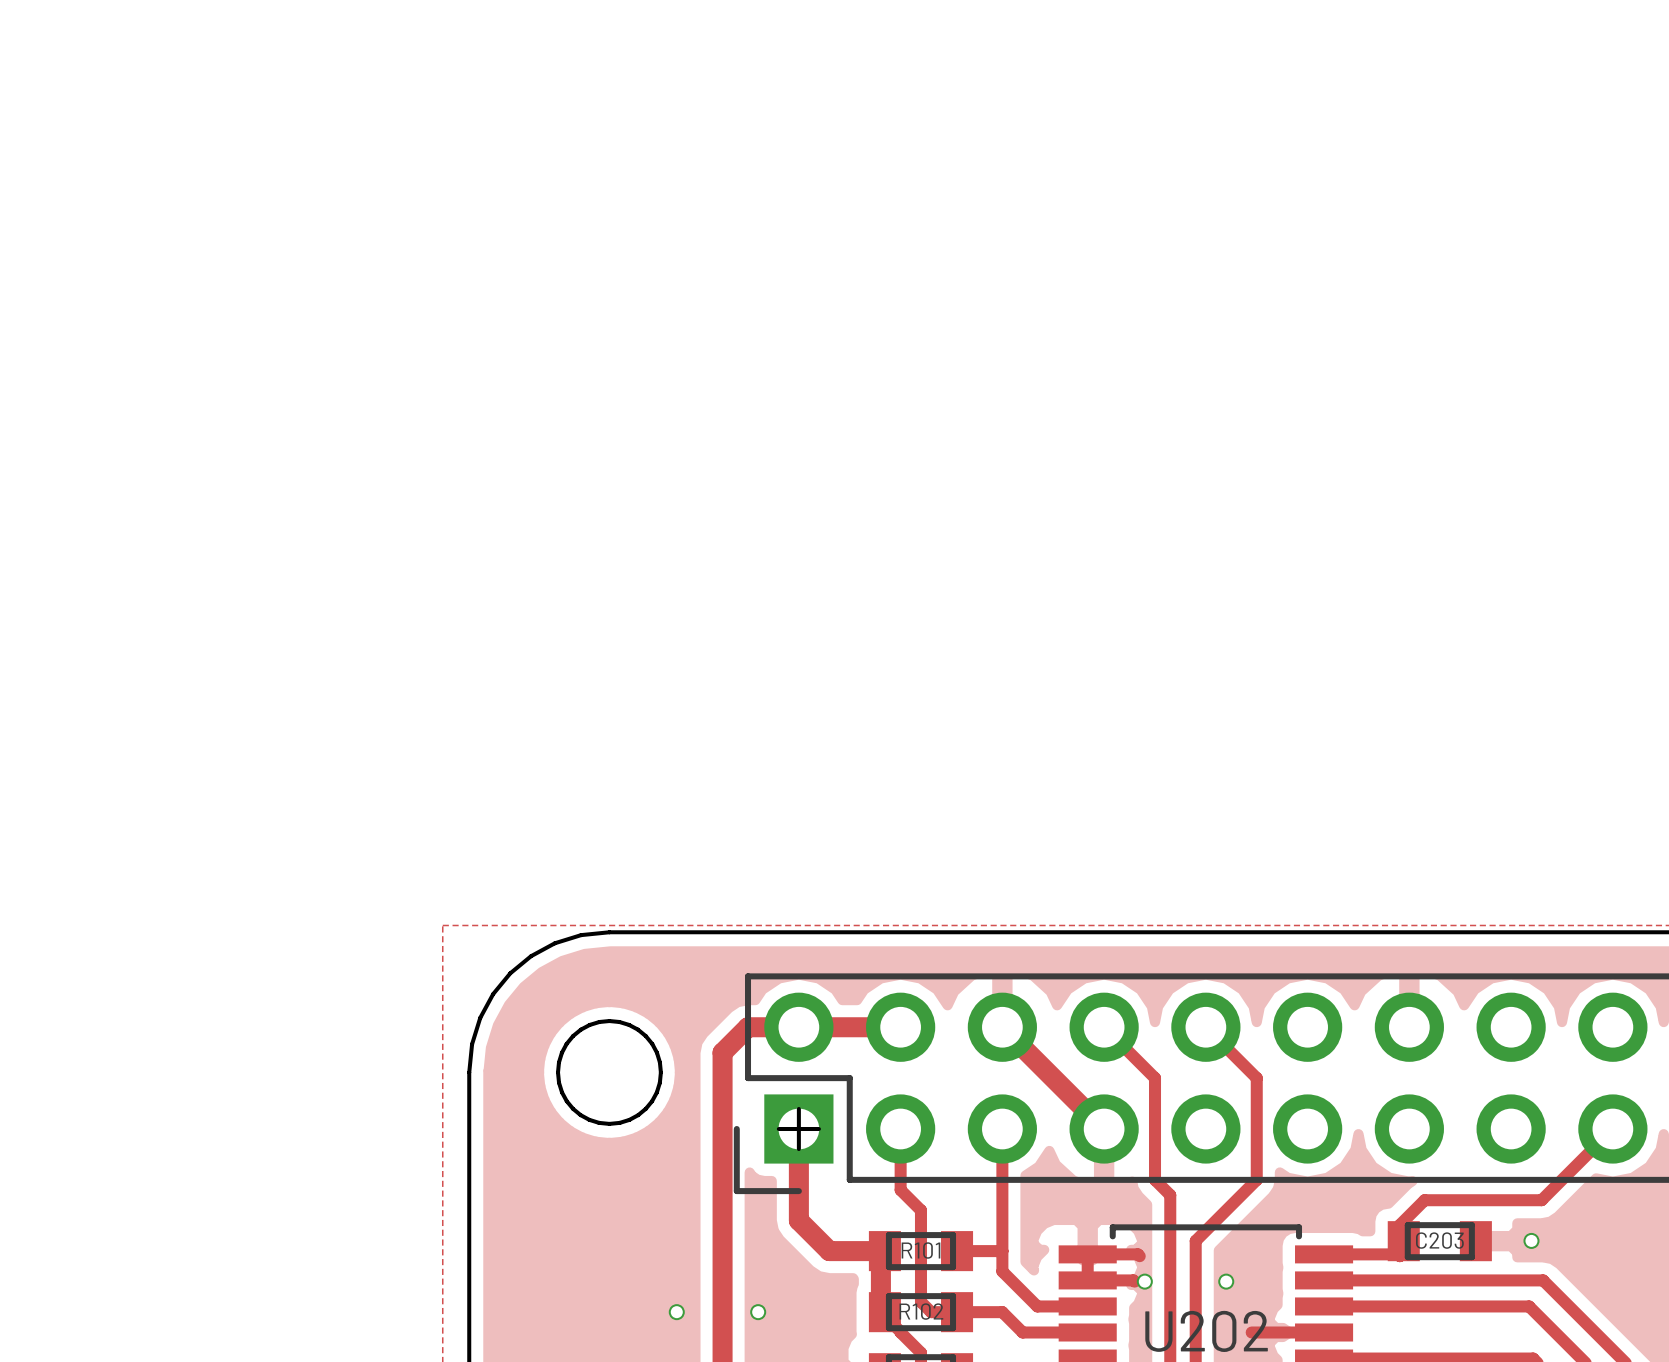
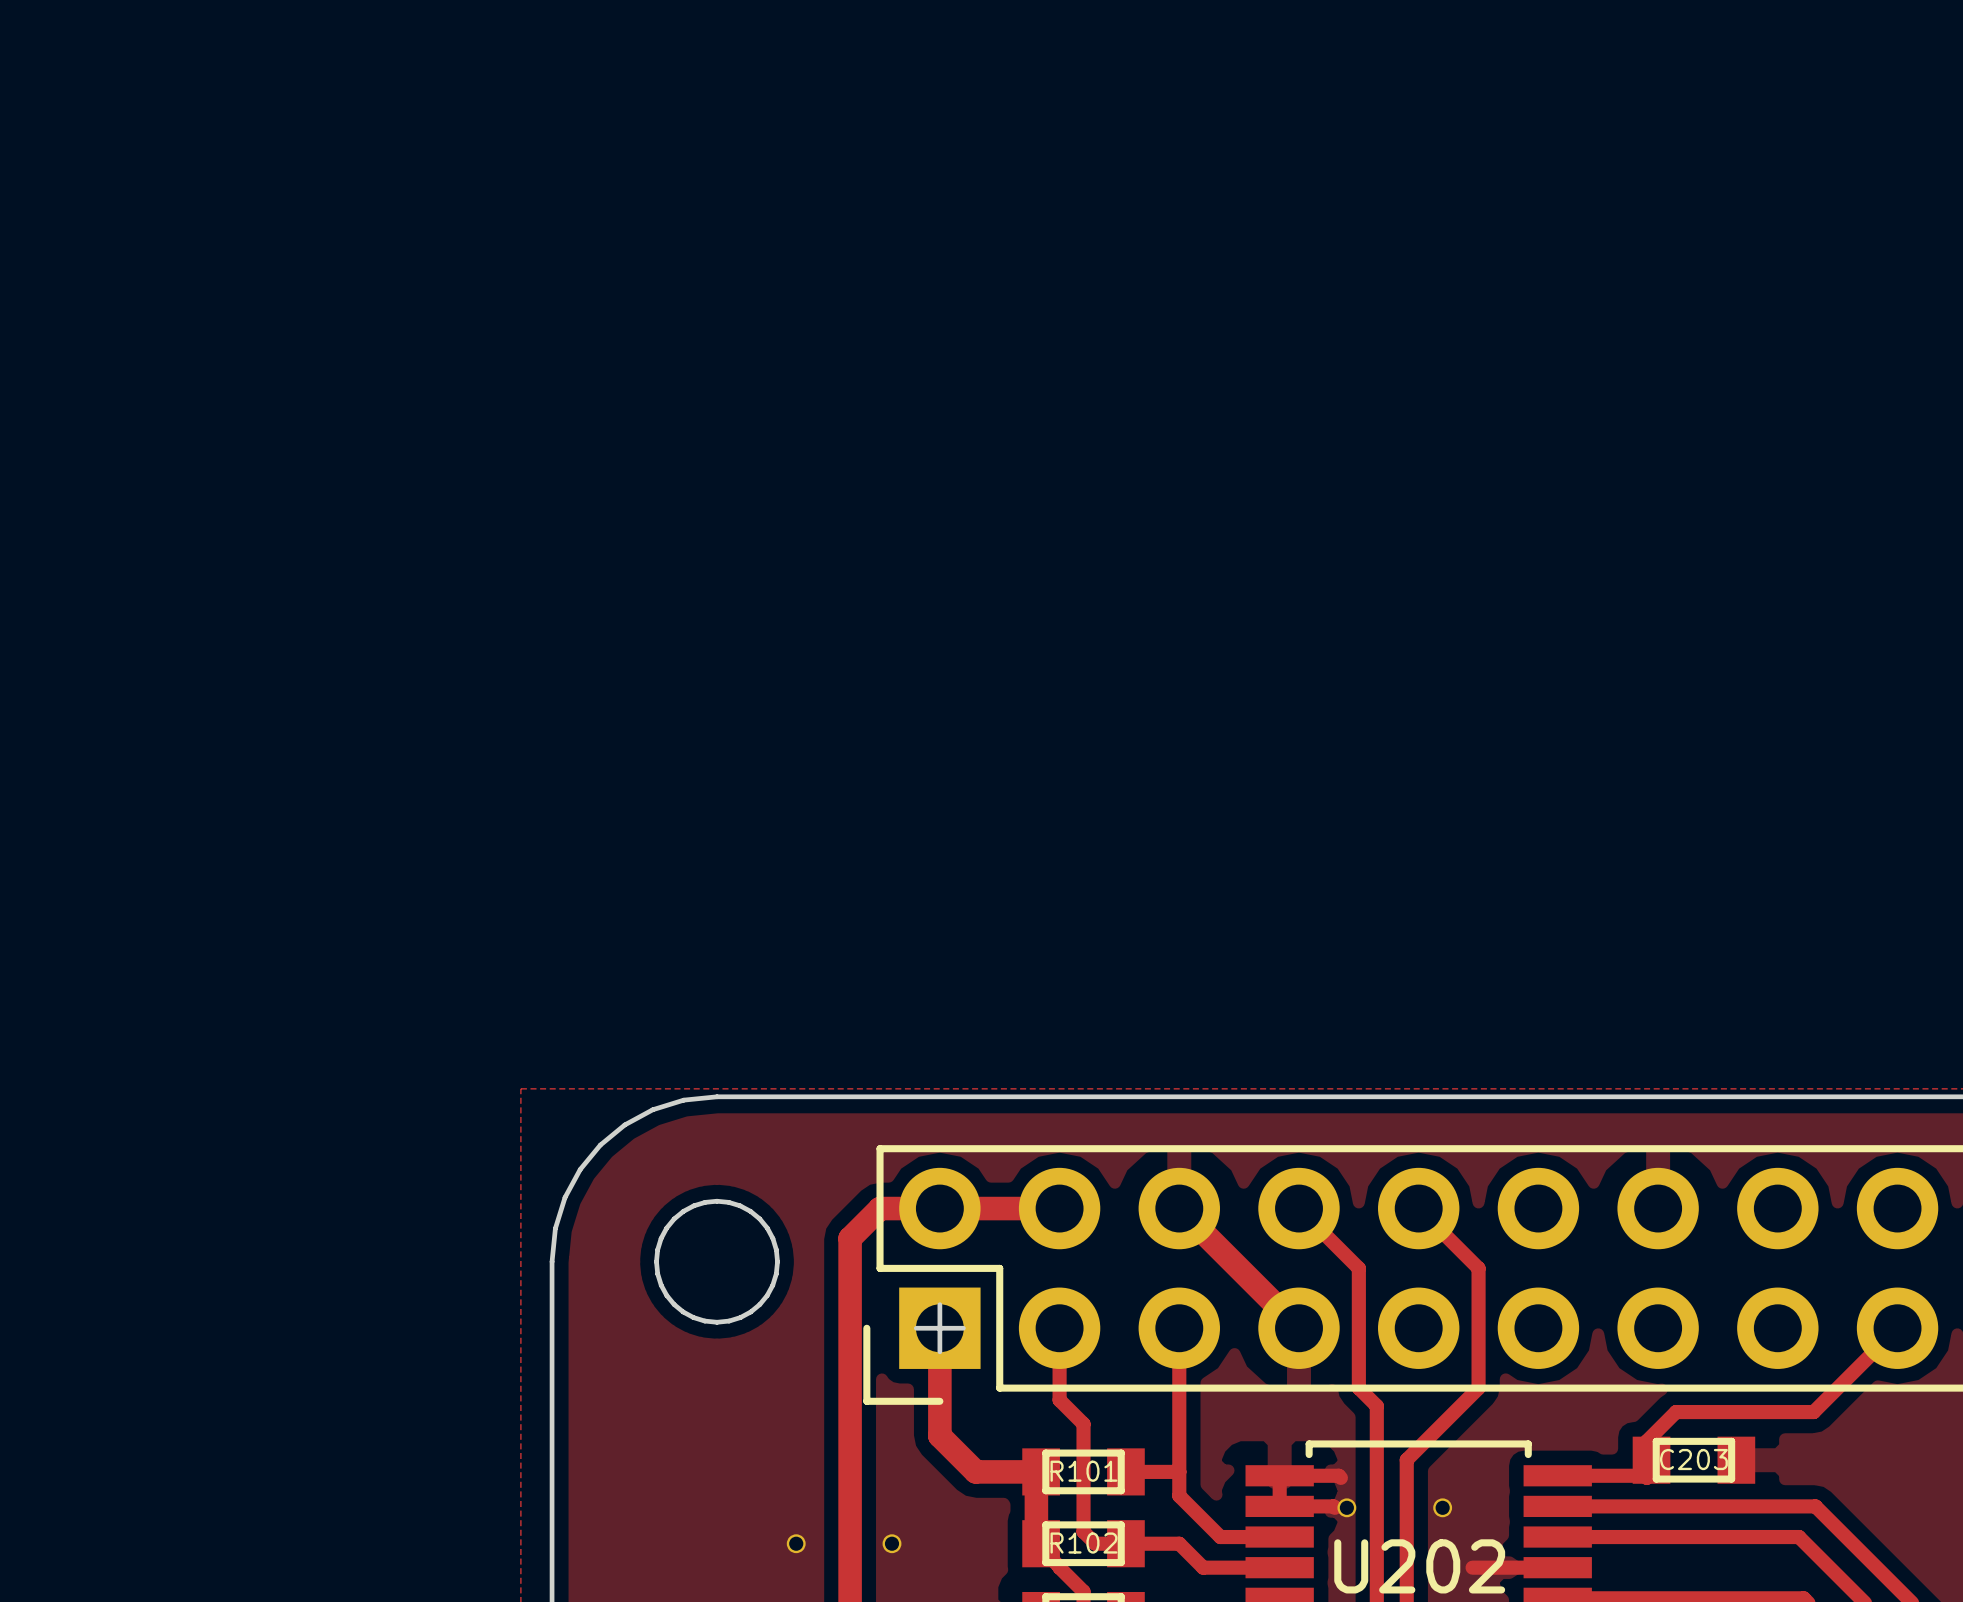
part: (1531, 1240) -> none

